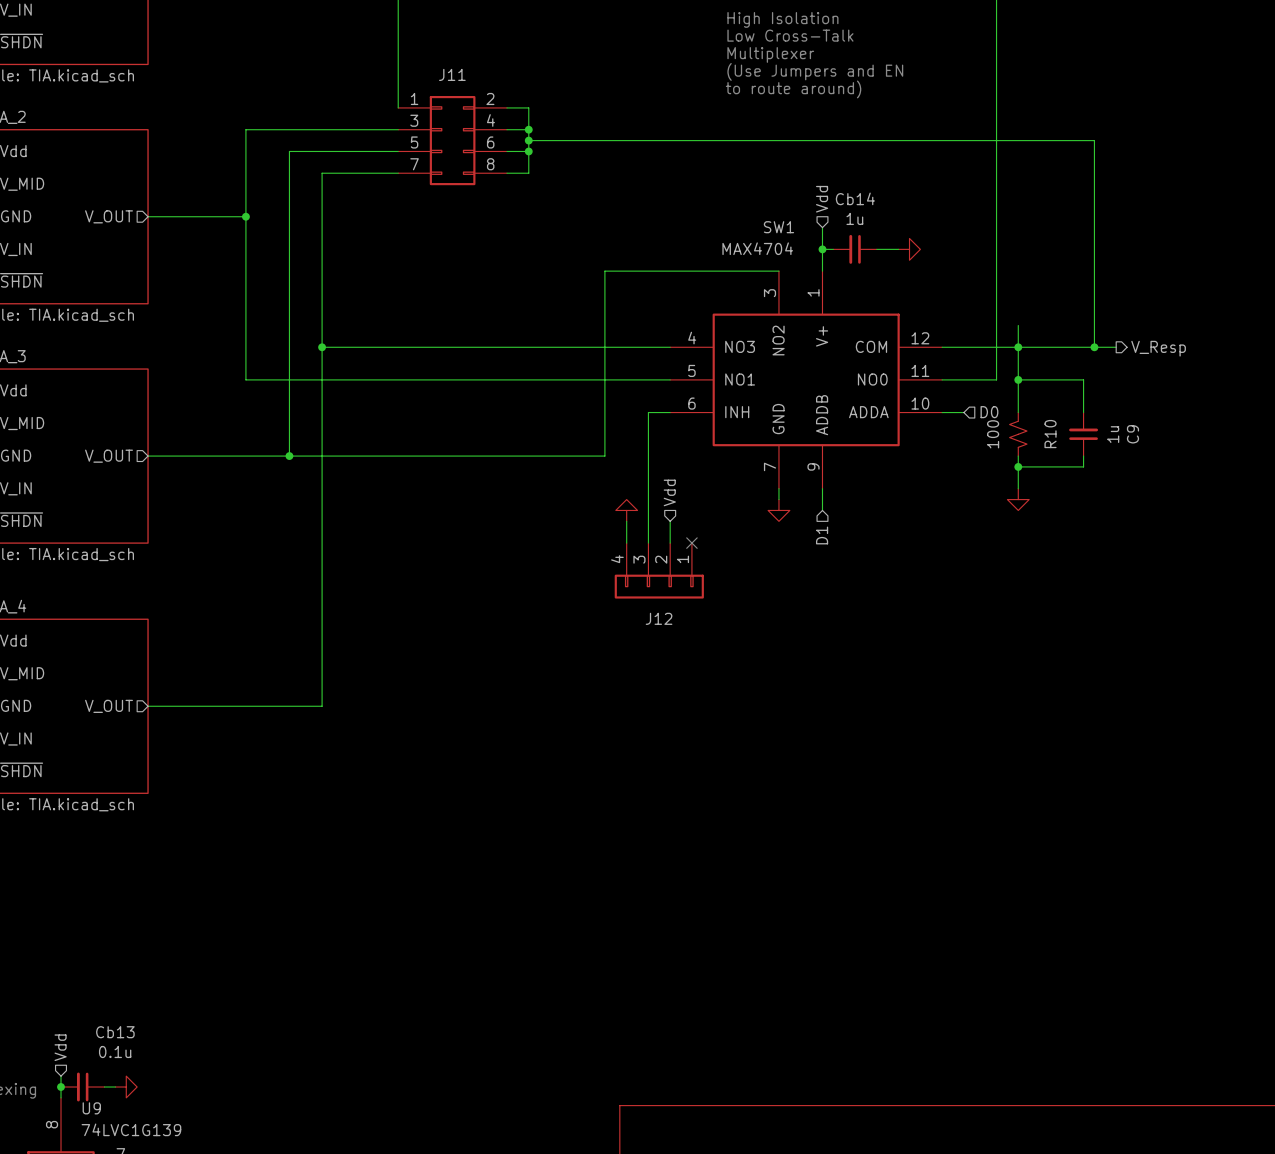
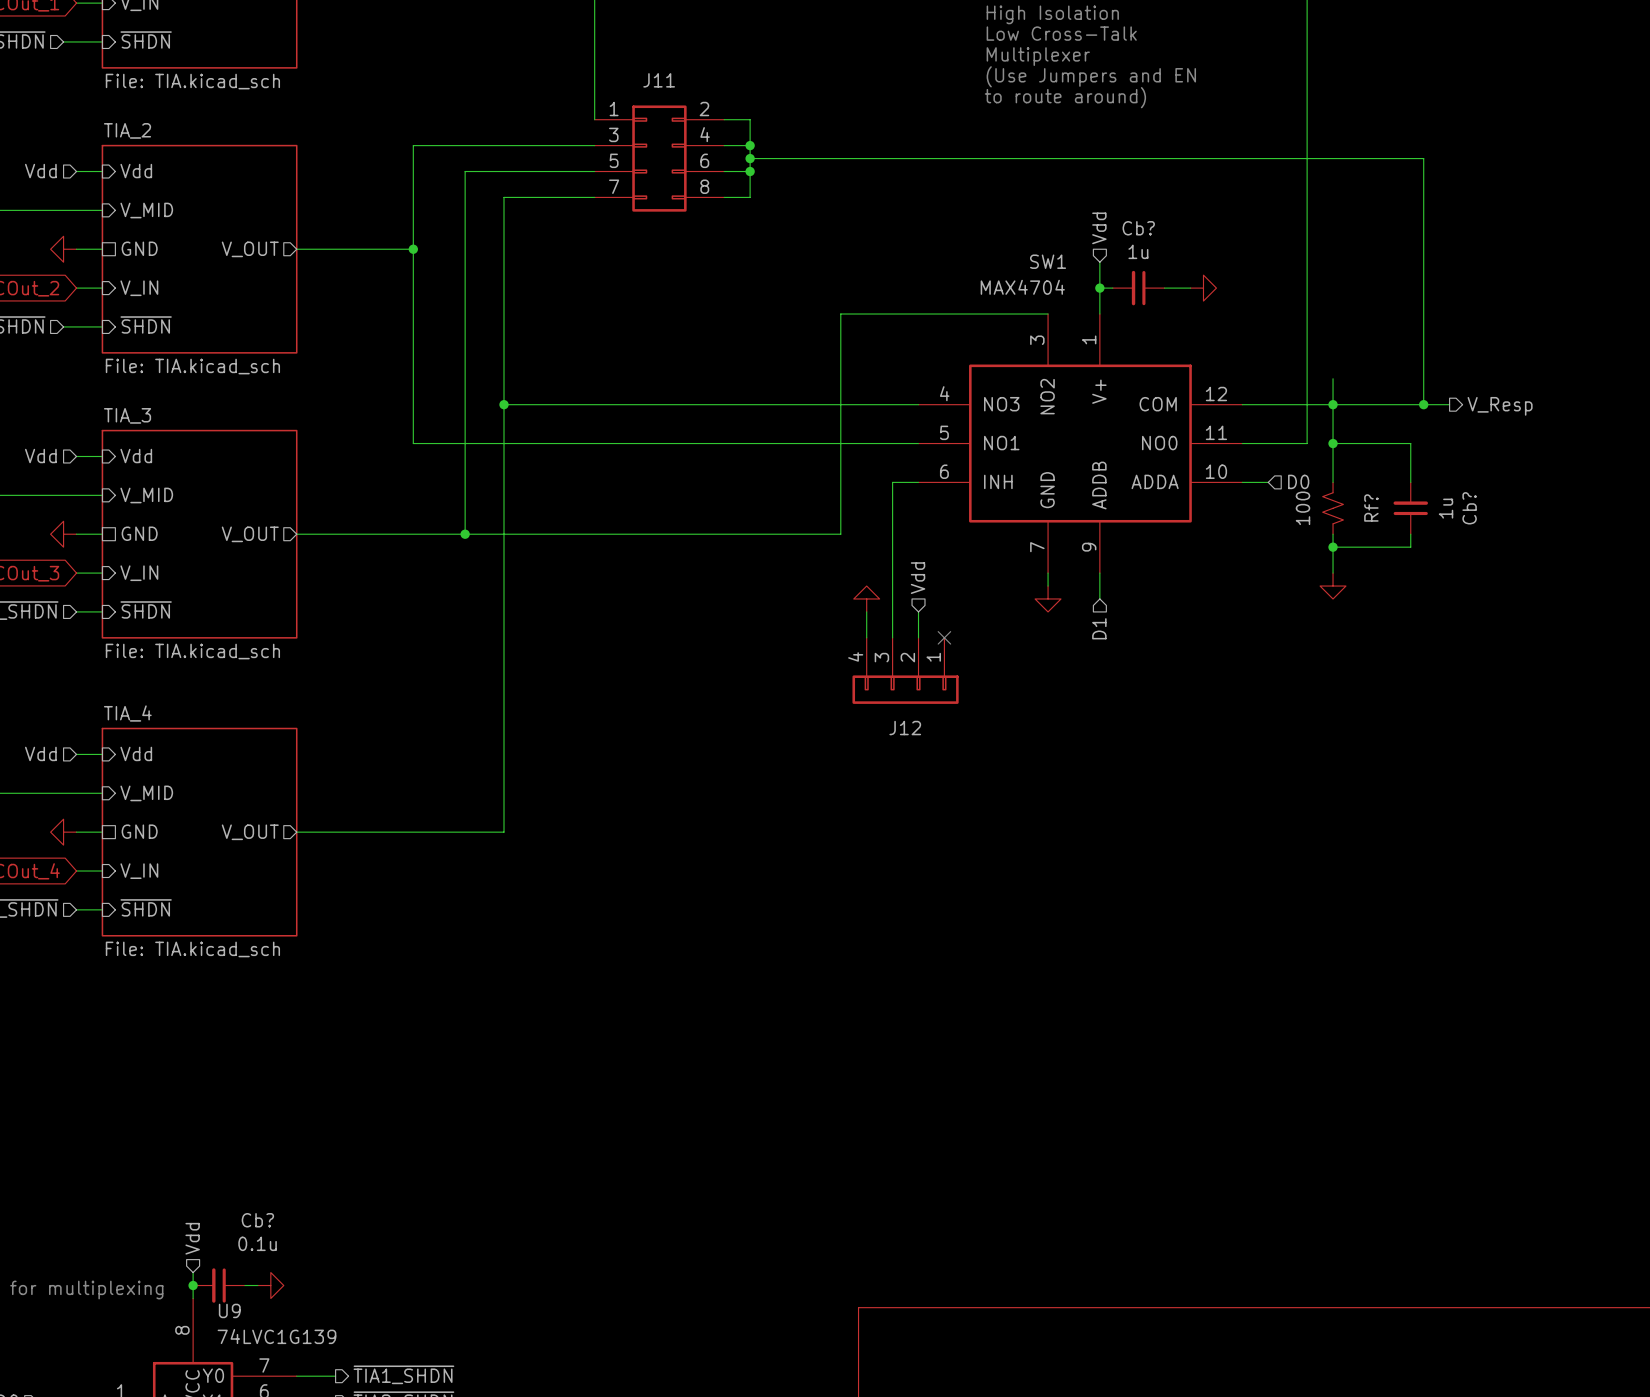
Cb14 name: Cb14 (855, 198) -> Cb? (1138, 228)
R10 name: R10 (1050, 434) -> Rf? (1371, 508)
C9 name: C9 (1132, 434) -> Cb? (1469, 508)
Cb13 name: Cb13 (115, 1032) -> Cb? (257, 1220)

